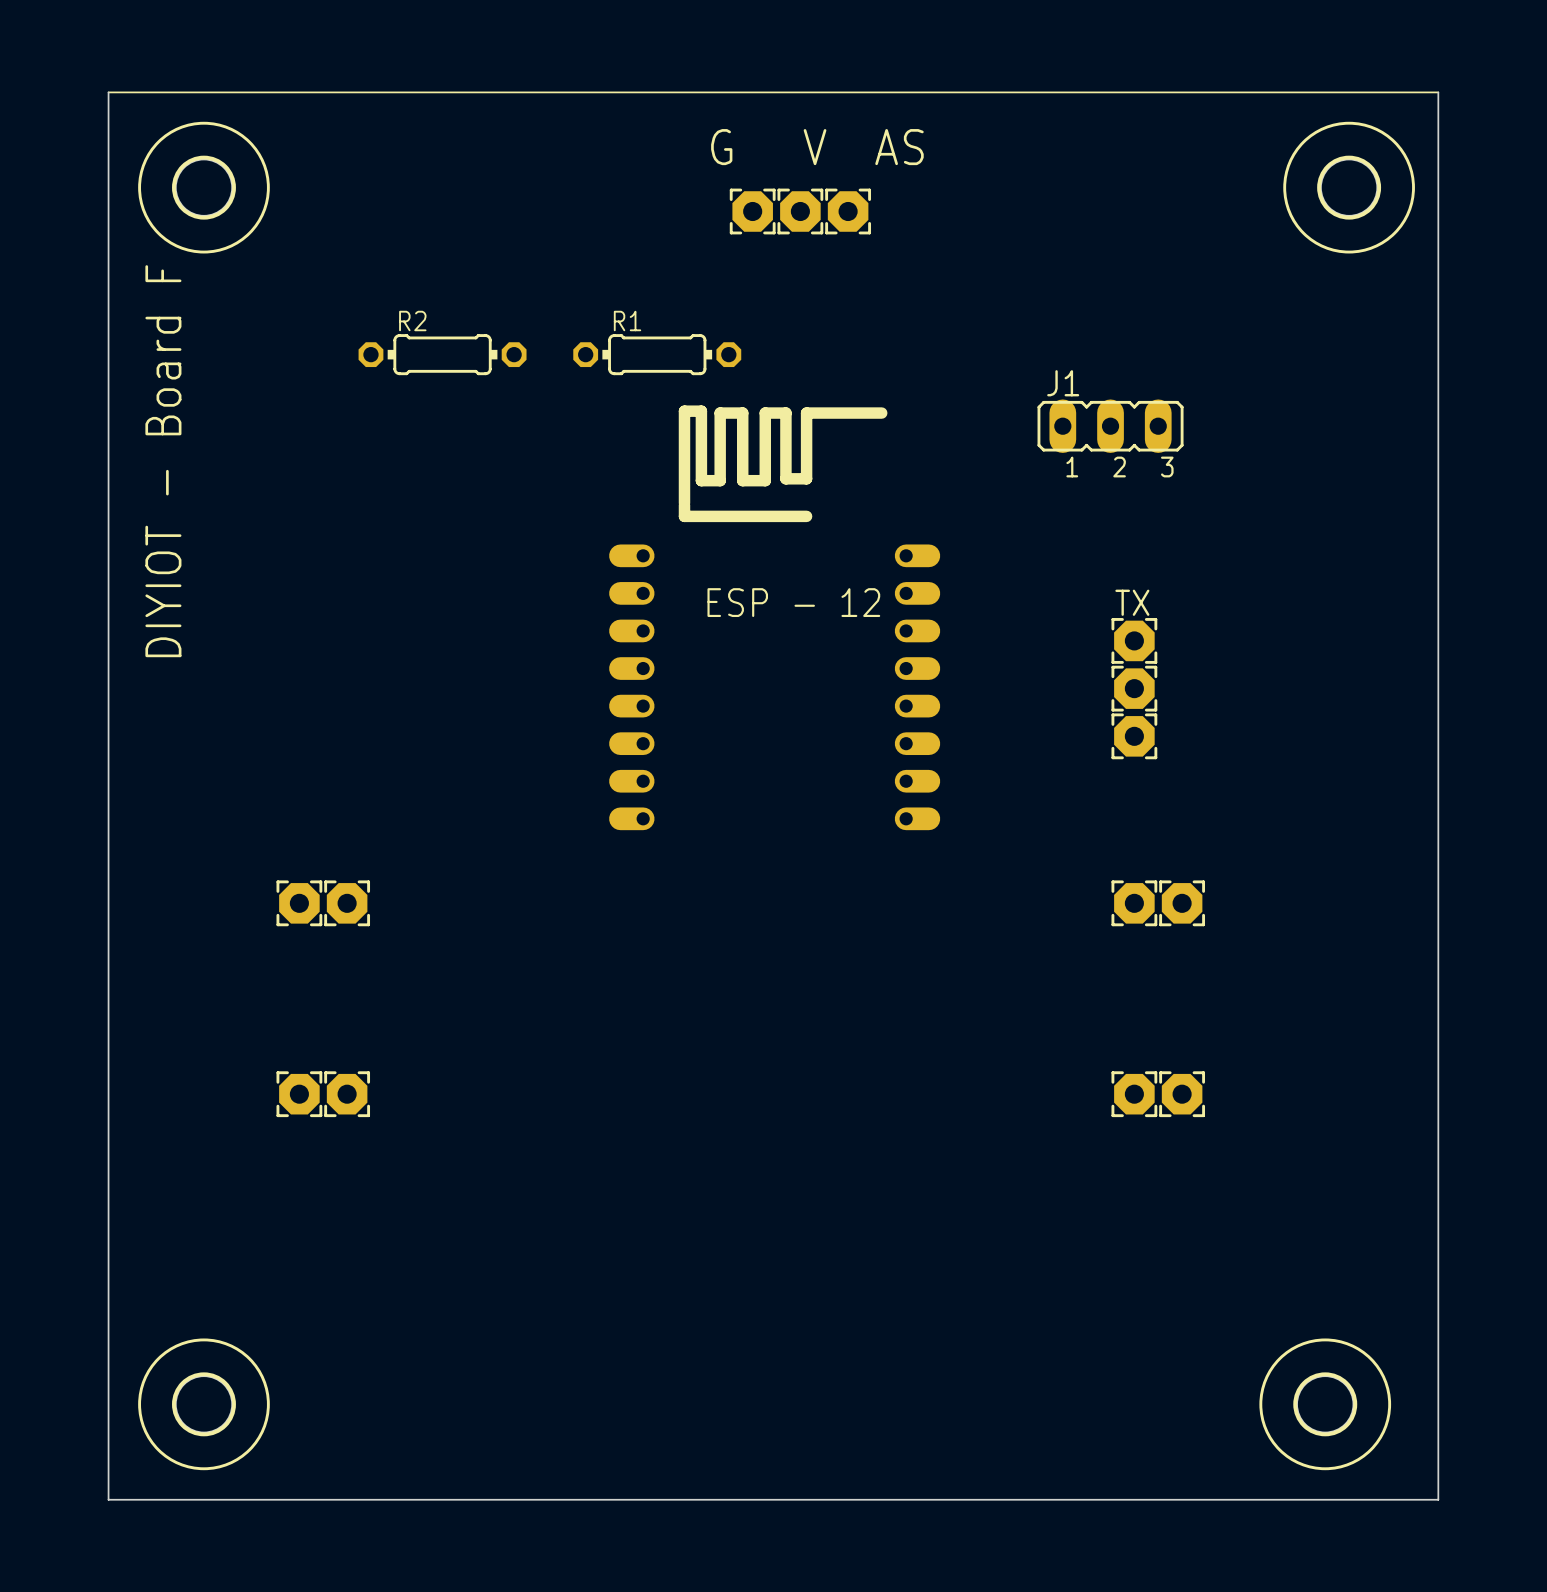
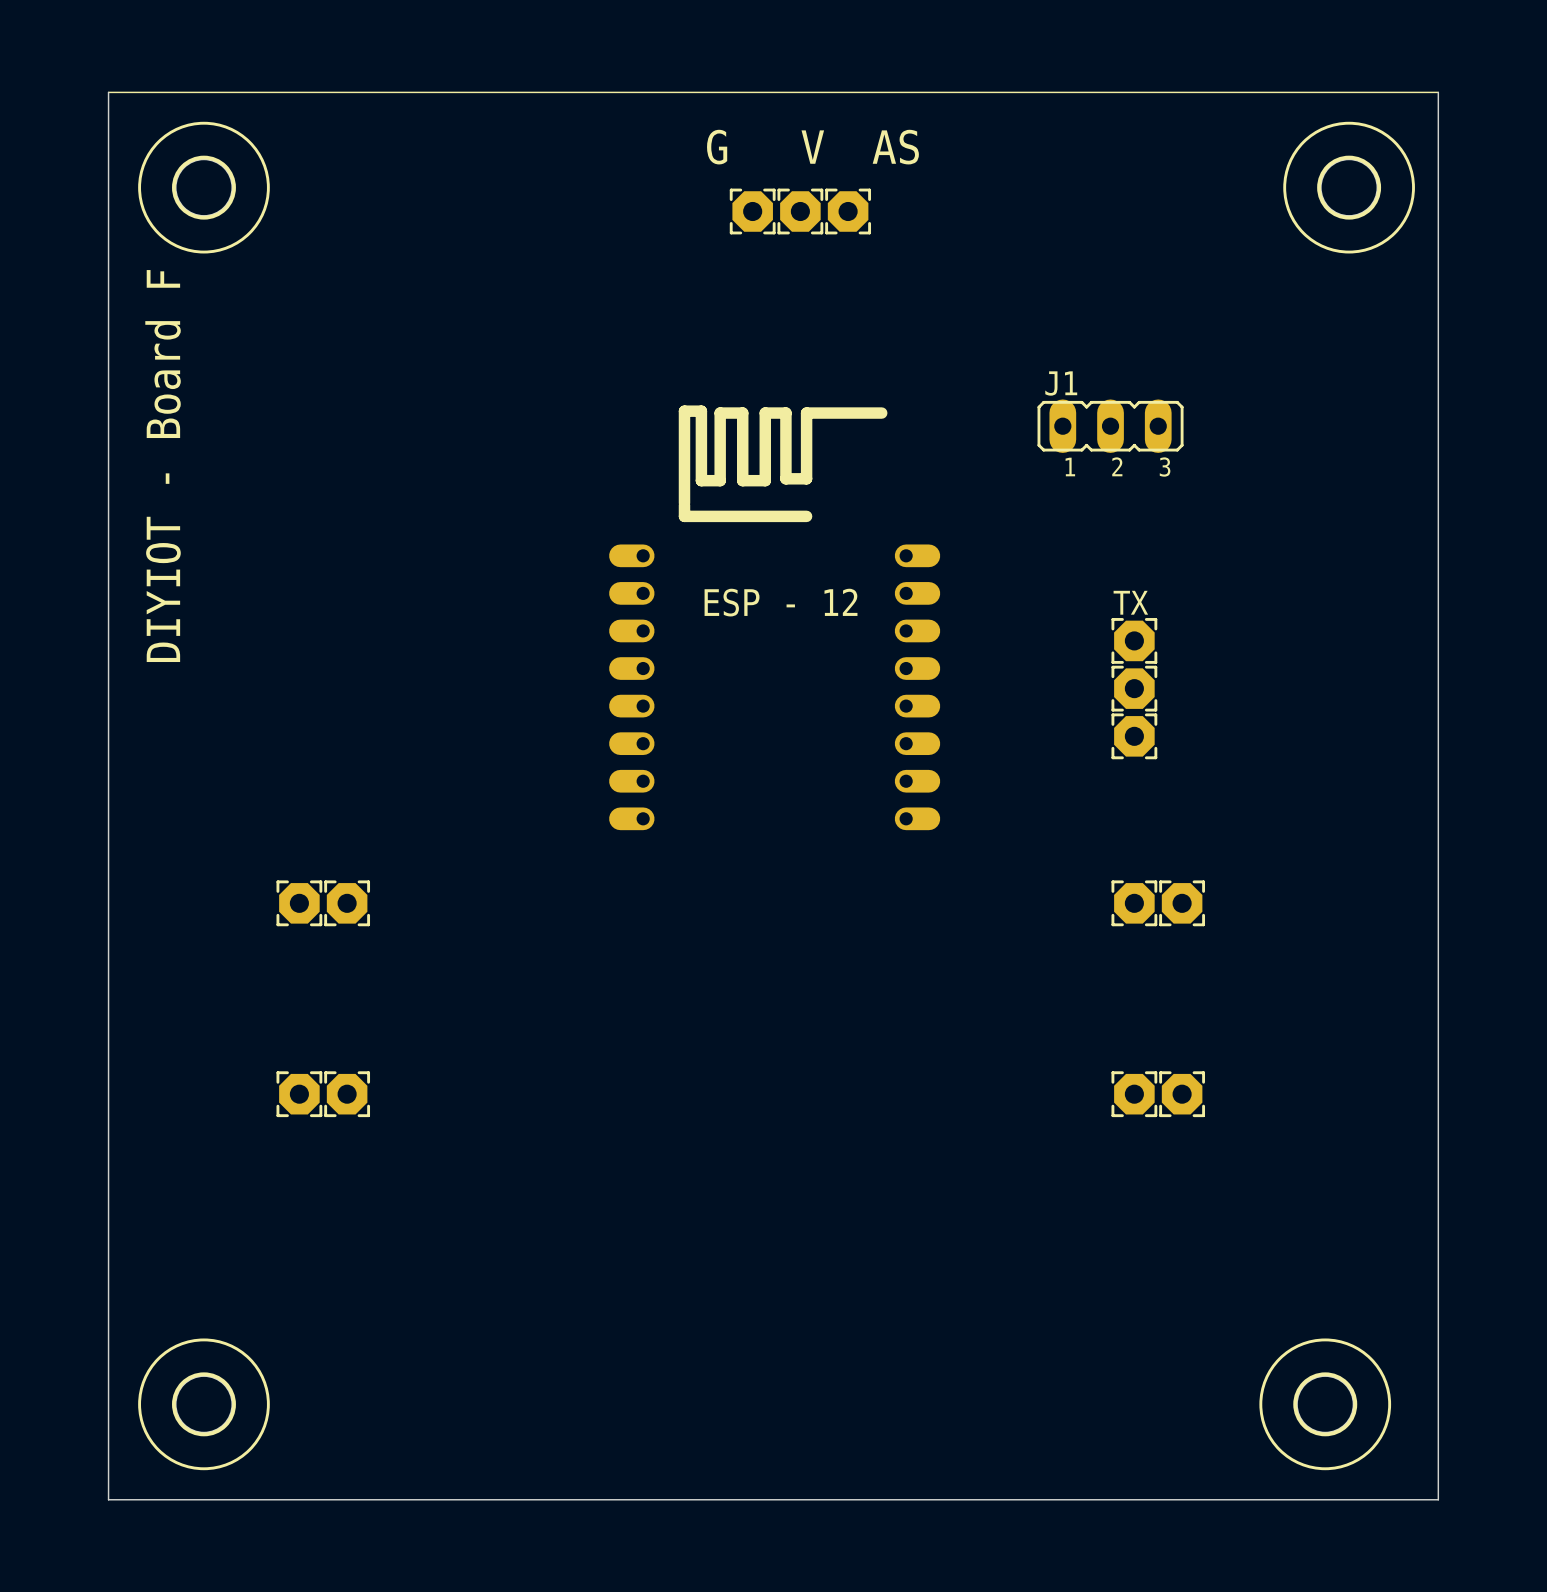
R2: (442, 354) -> none
R1: (657, 354) -> none

